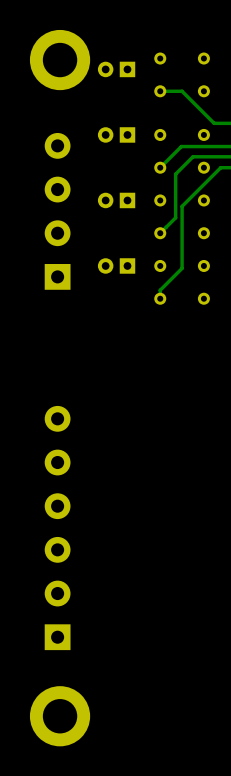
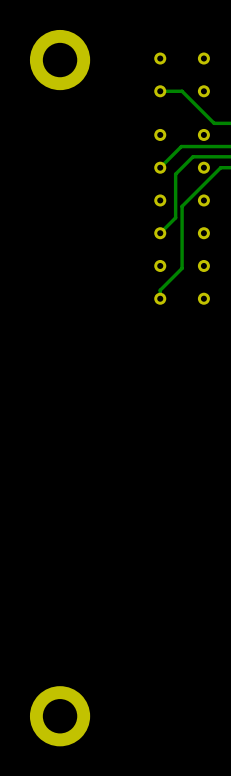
part: (116, 69) -> none
part: (116, 134) -> none
part: (116, 200) -> none
part: (57, 211) -> none
part: (116, 265) -> none
part: (57, 528) -> none

